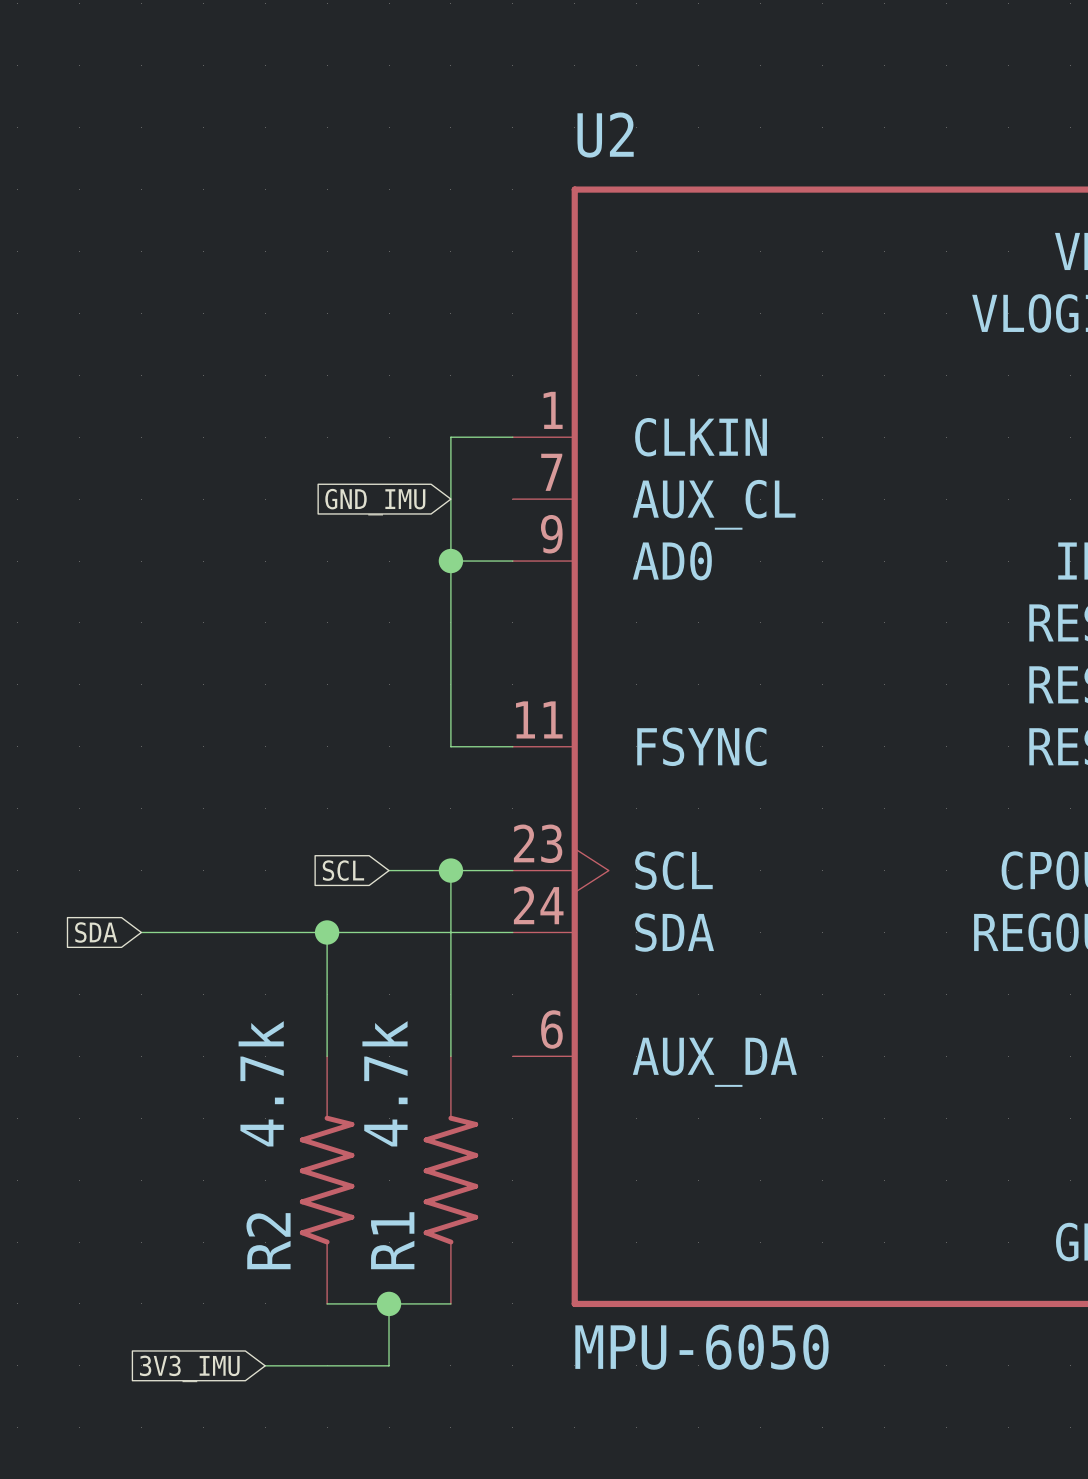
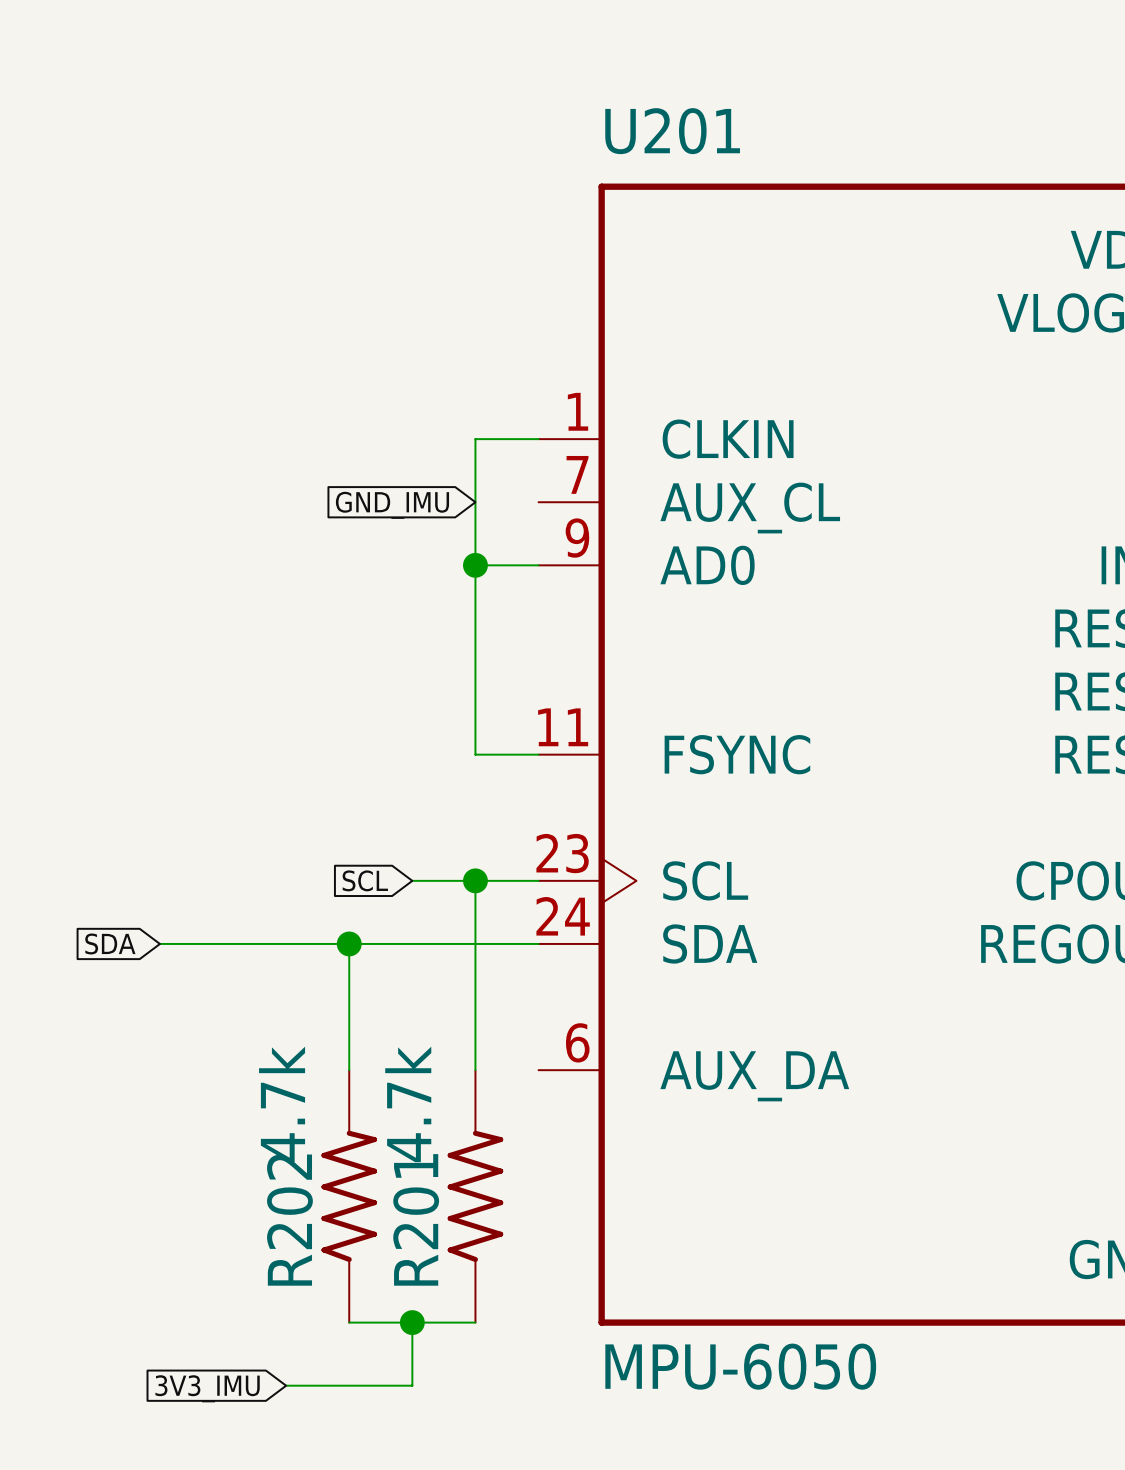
U2 name: U2 (605, 135) -> U201 (672, 131)
R1 name: R1 (392, 1240) -> R201 (416, 1219)
R2 name: R2 (268, 1241) -> R202 (289, 1220)

